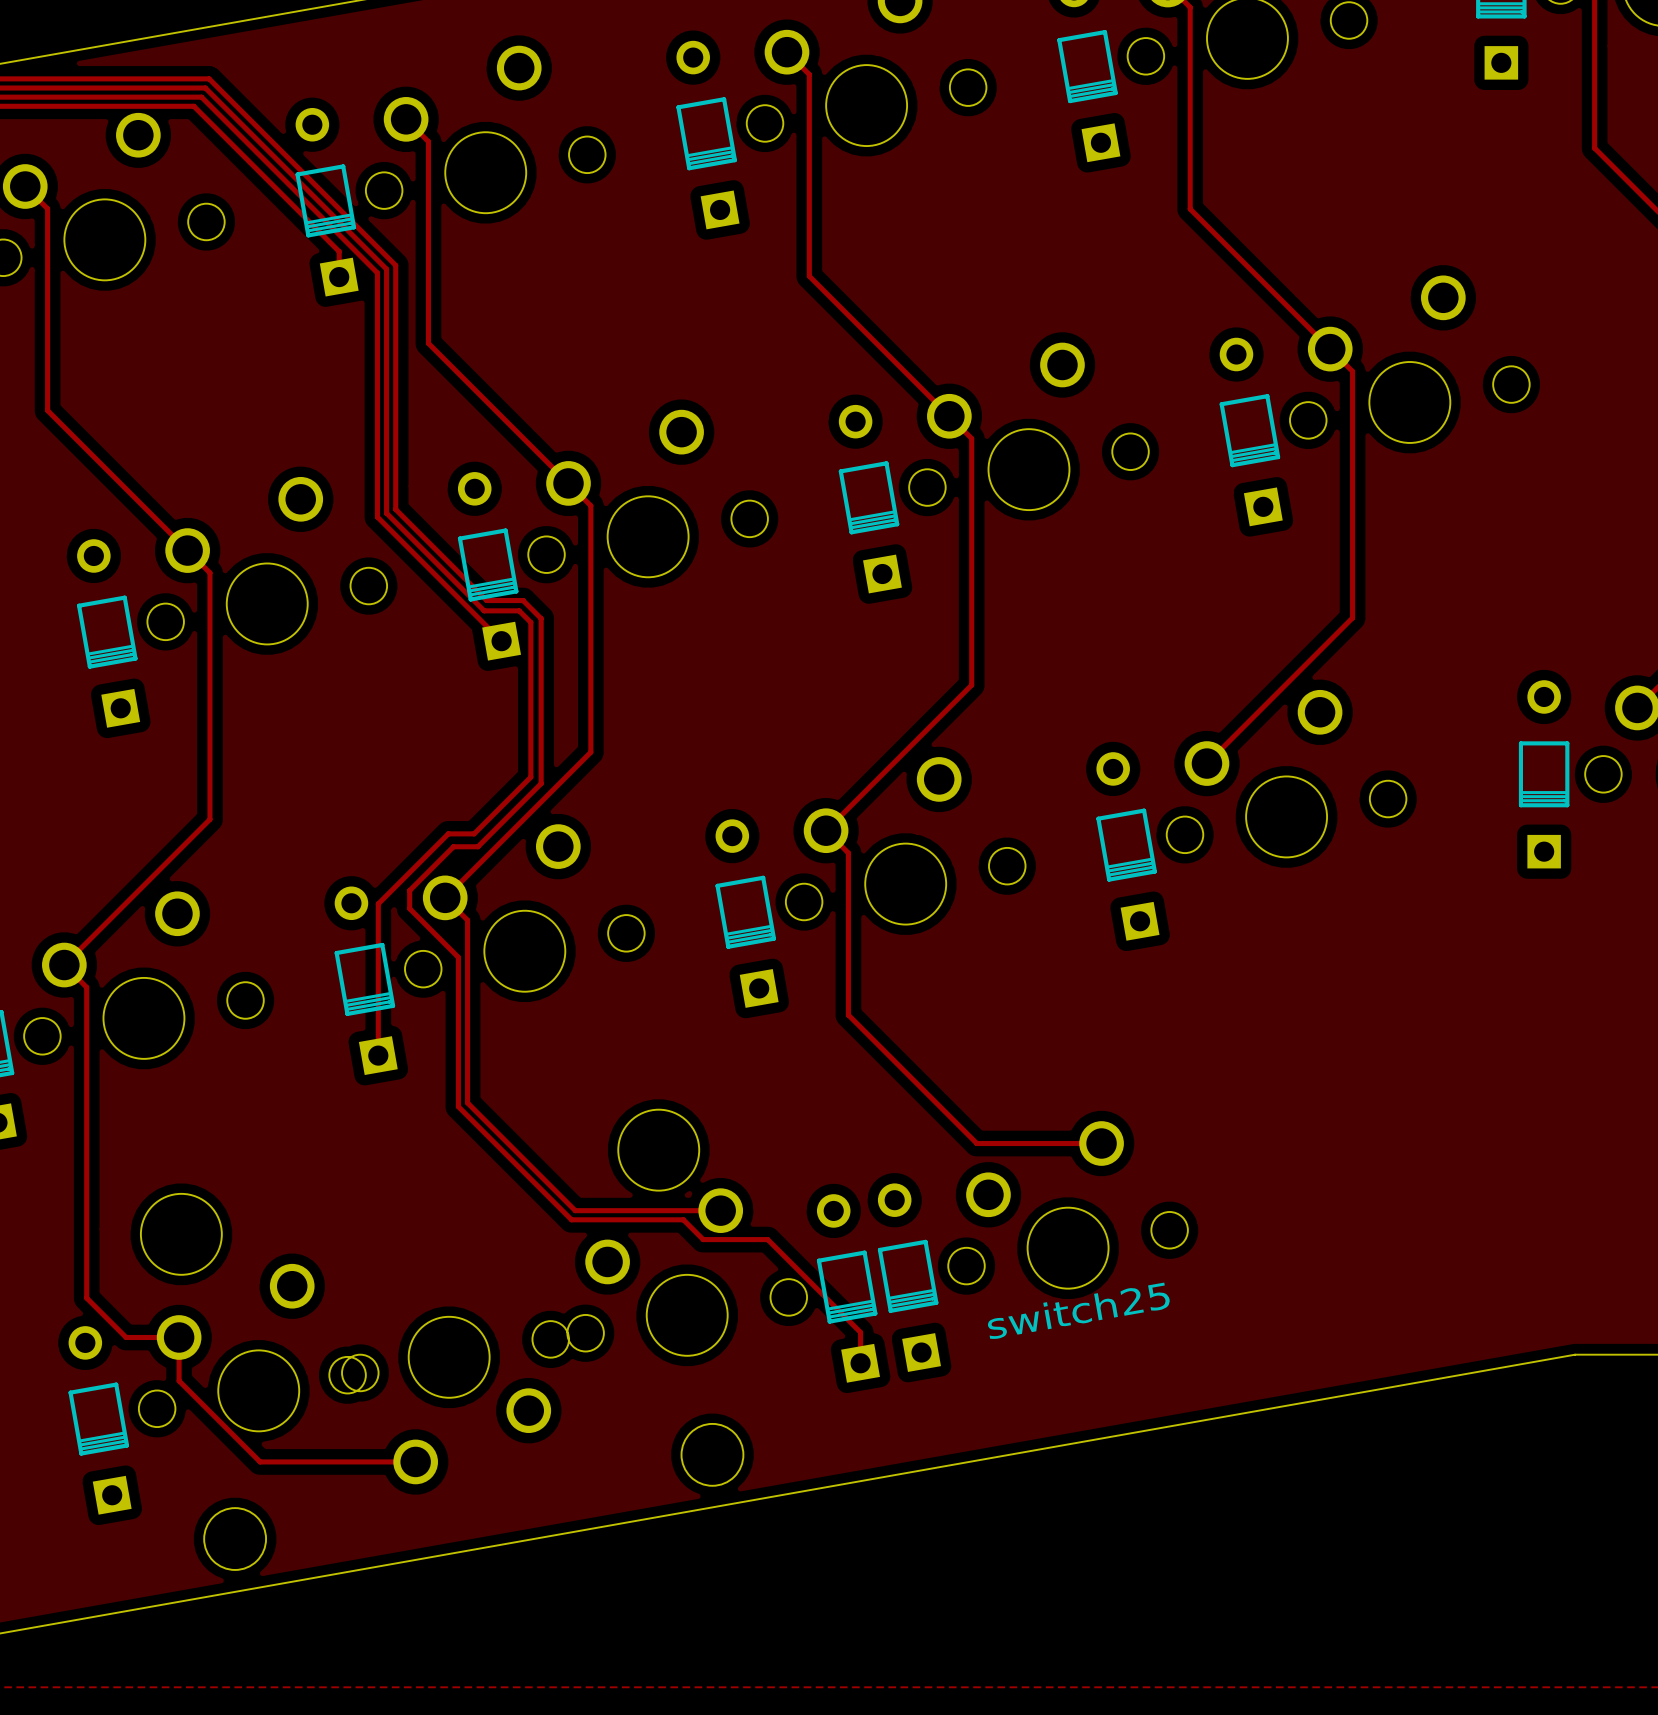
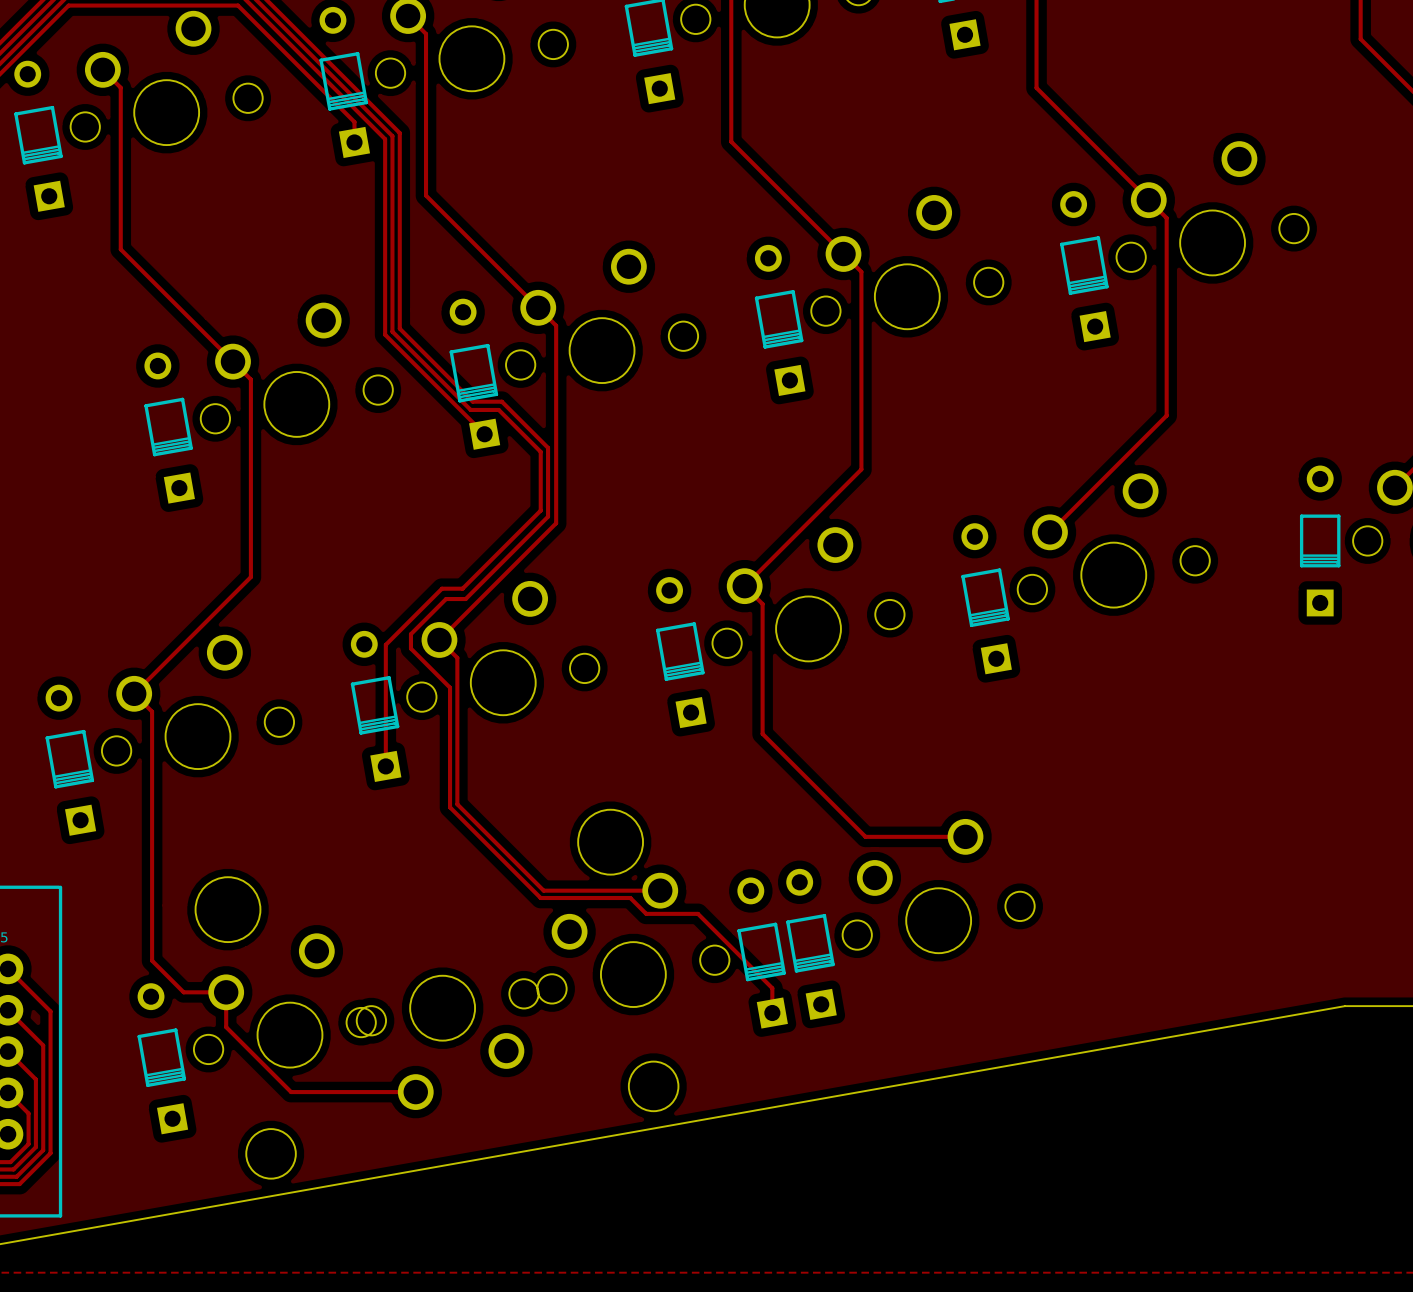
track: (541, 618) (541, 783) -> (516, 416) (548, 447) (548, 516) (516, 548)
track: (530, 622) (530, 777) -> (508, 419) (540, 451) (540, 510) (508, 543)
switch25 name: switch25 (1078, 1310) -> none

